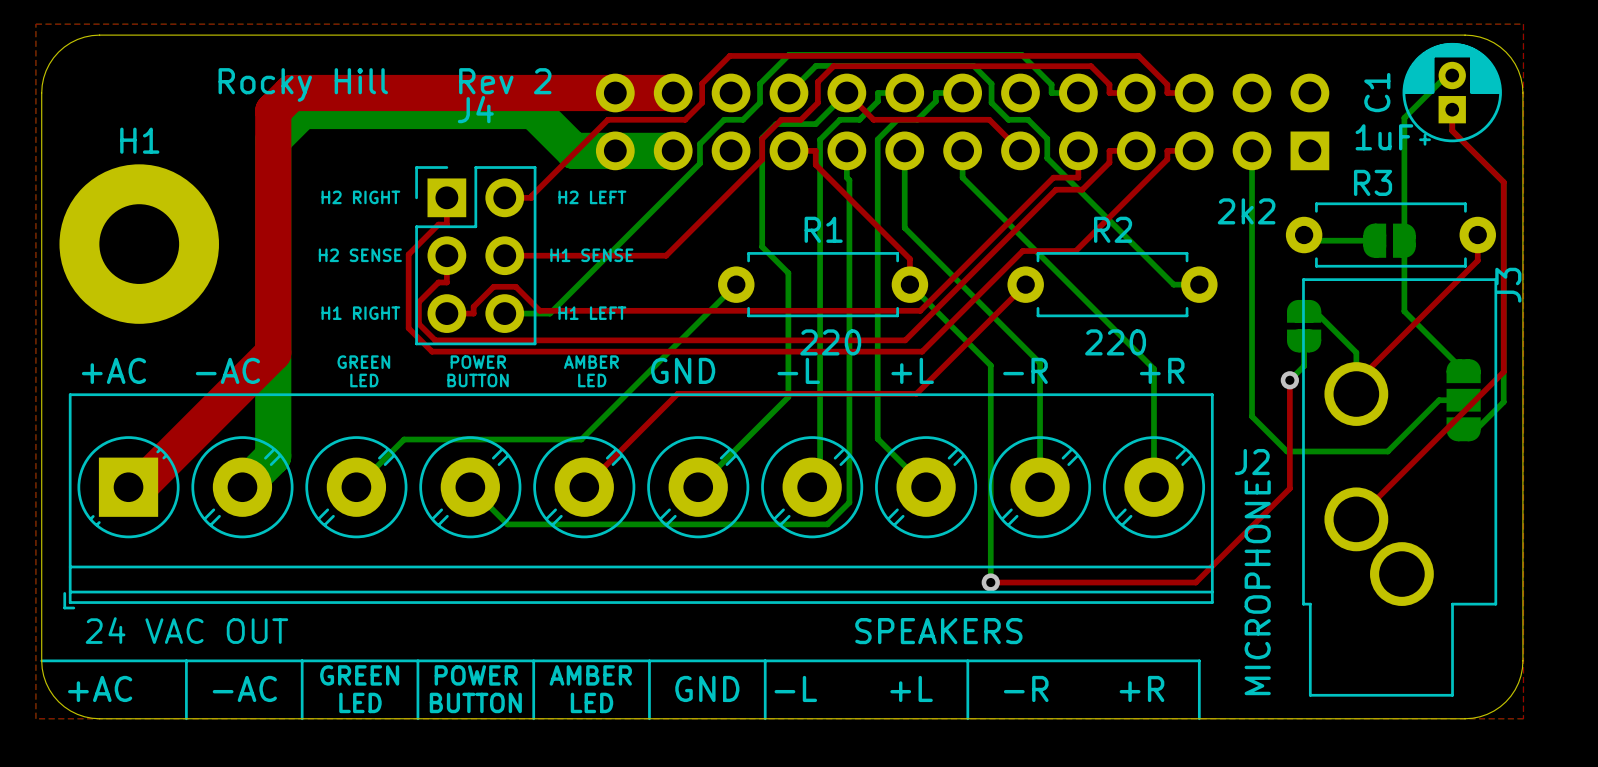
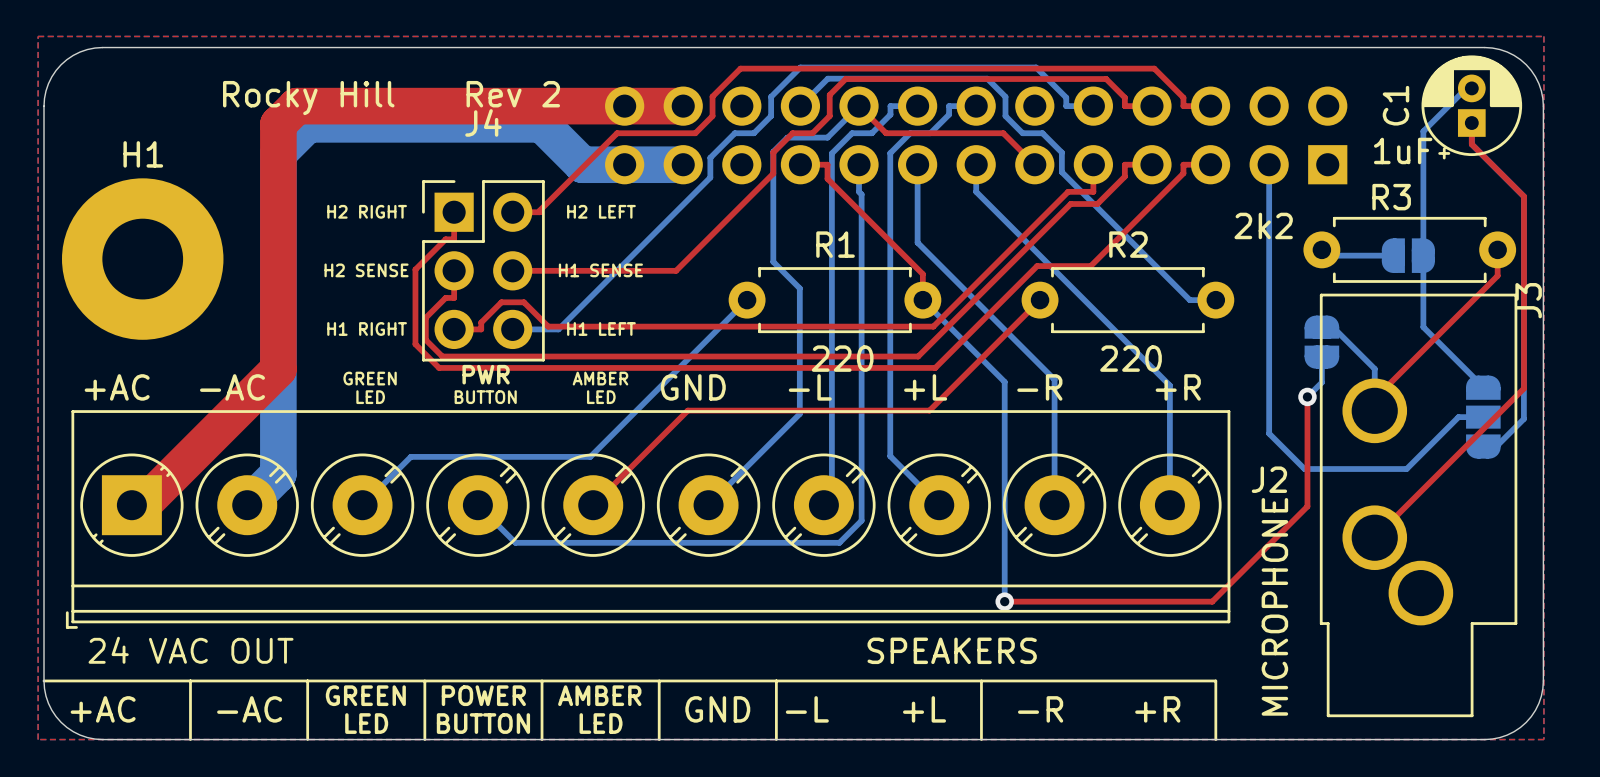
text: POWER (478, 362) -> PWR (486, 374)

